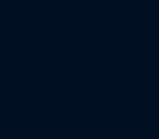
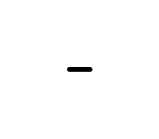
line: none -> (69, 69) (90, 69)

